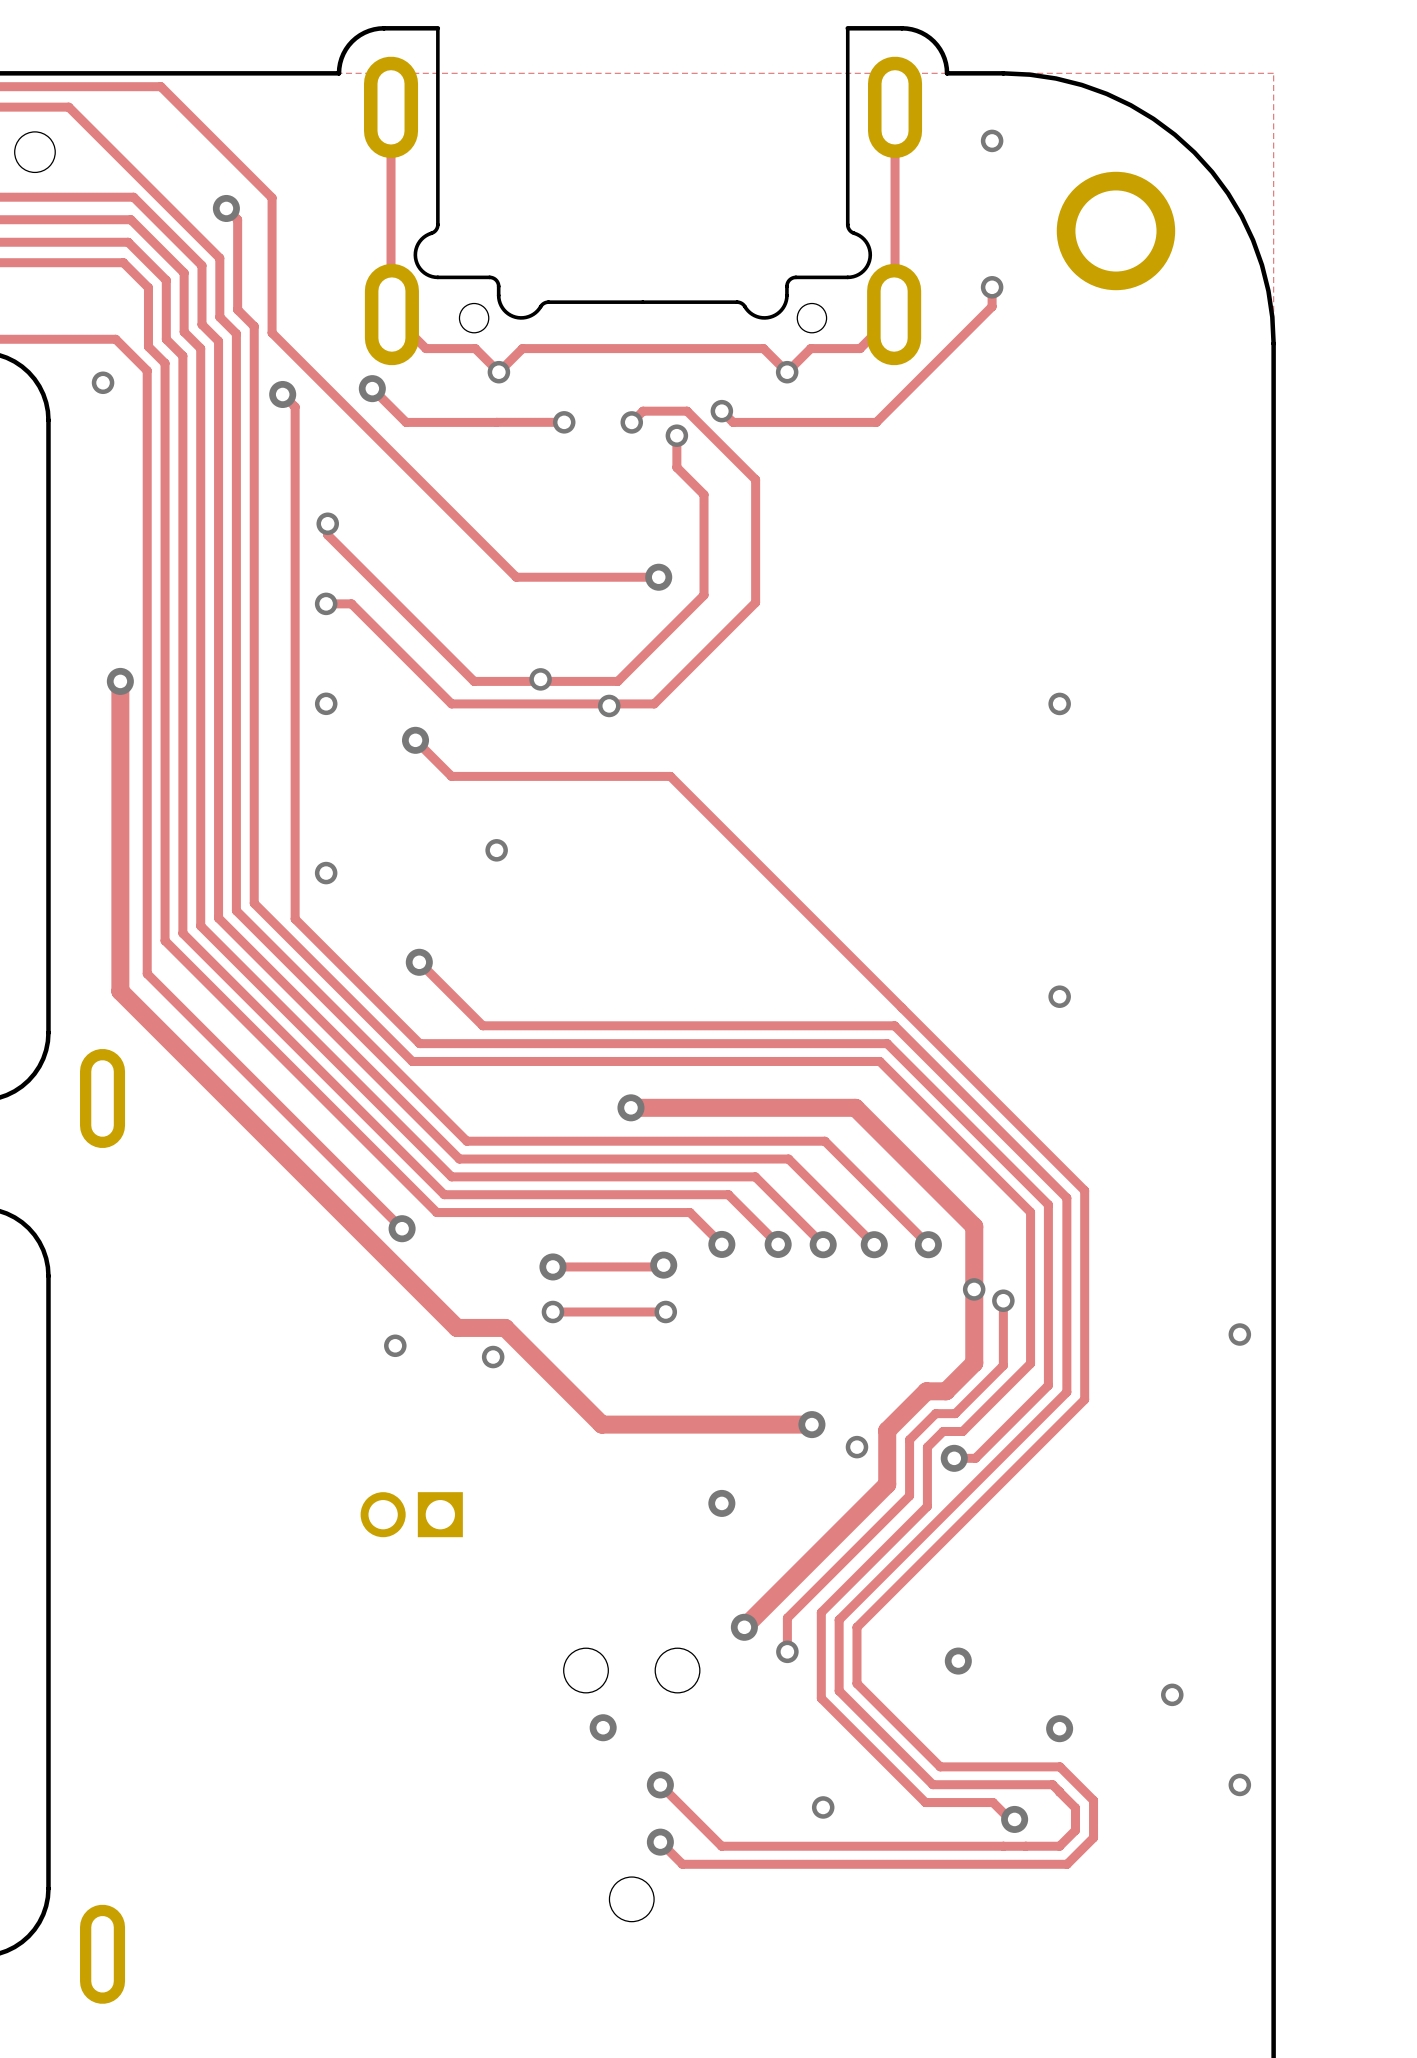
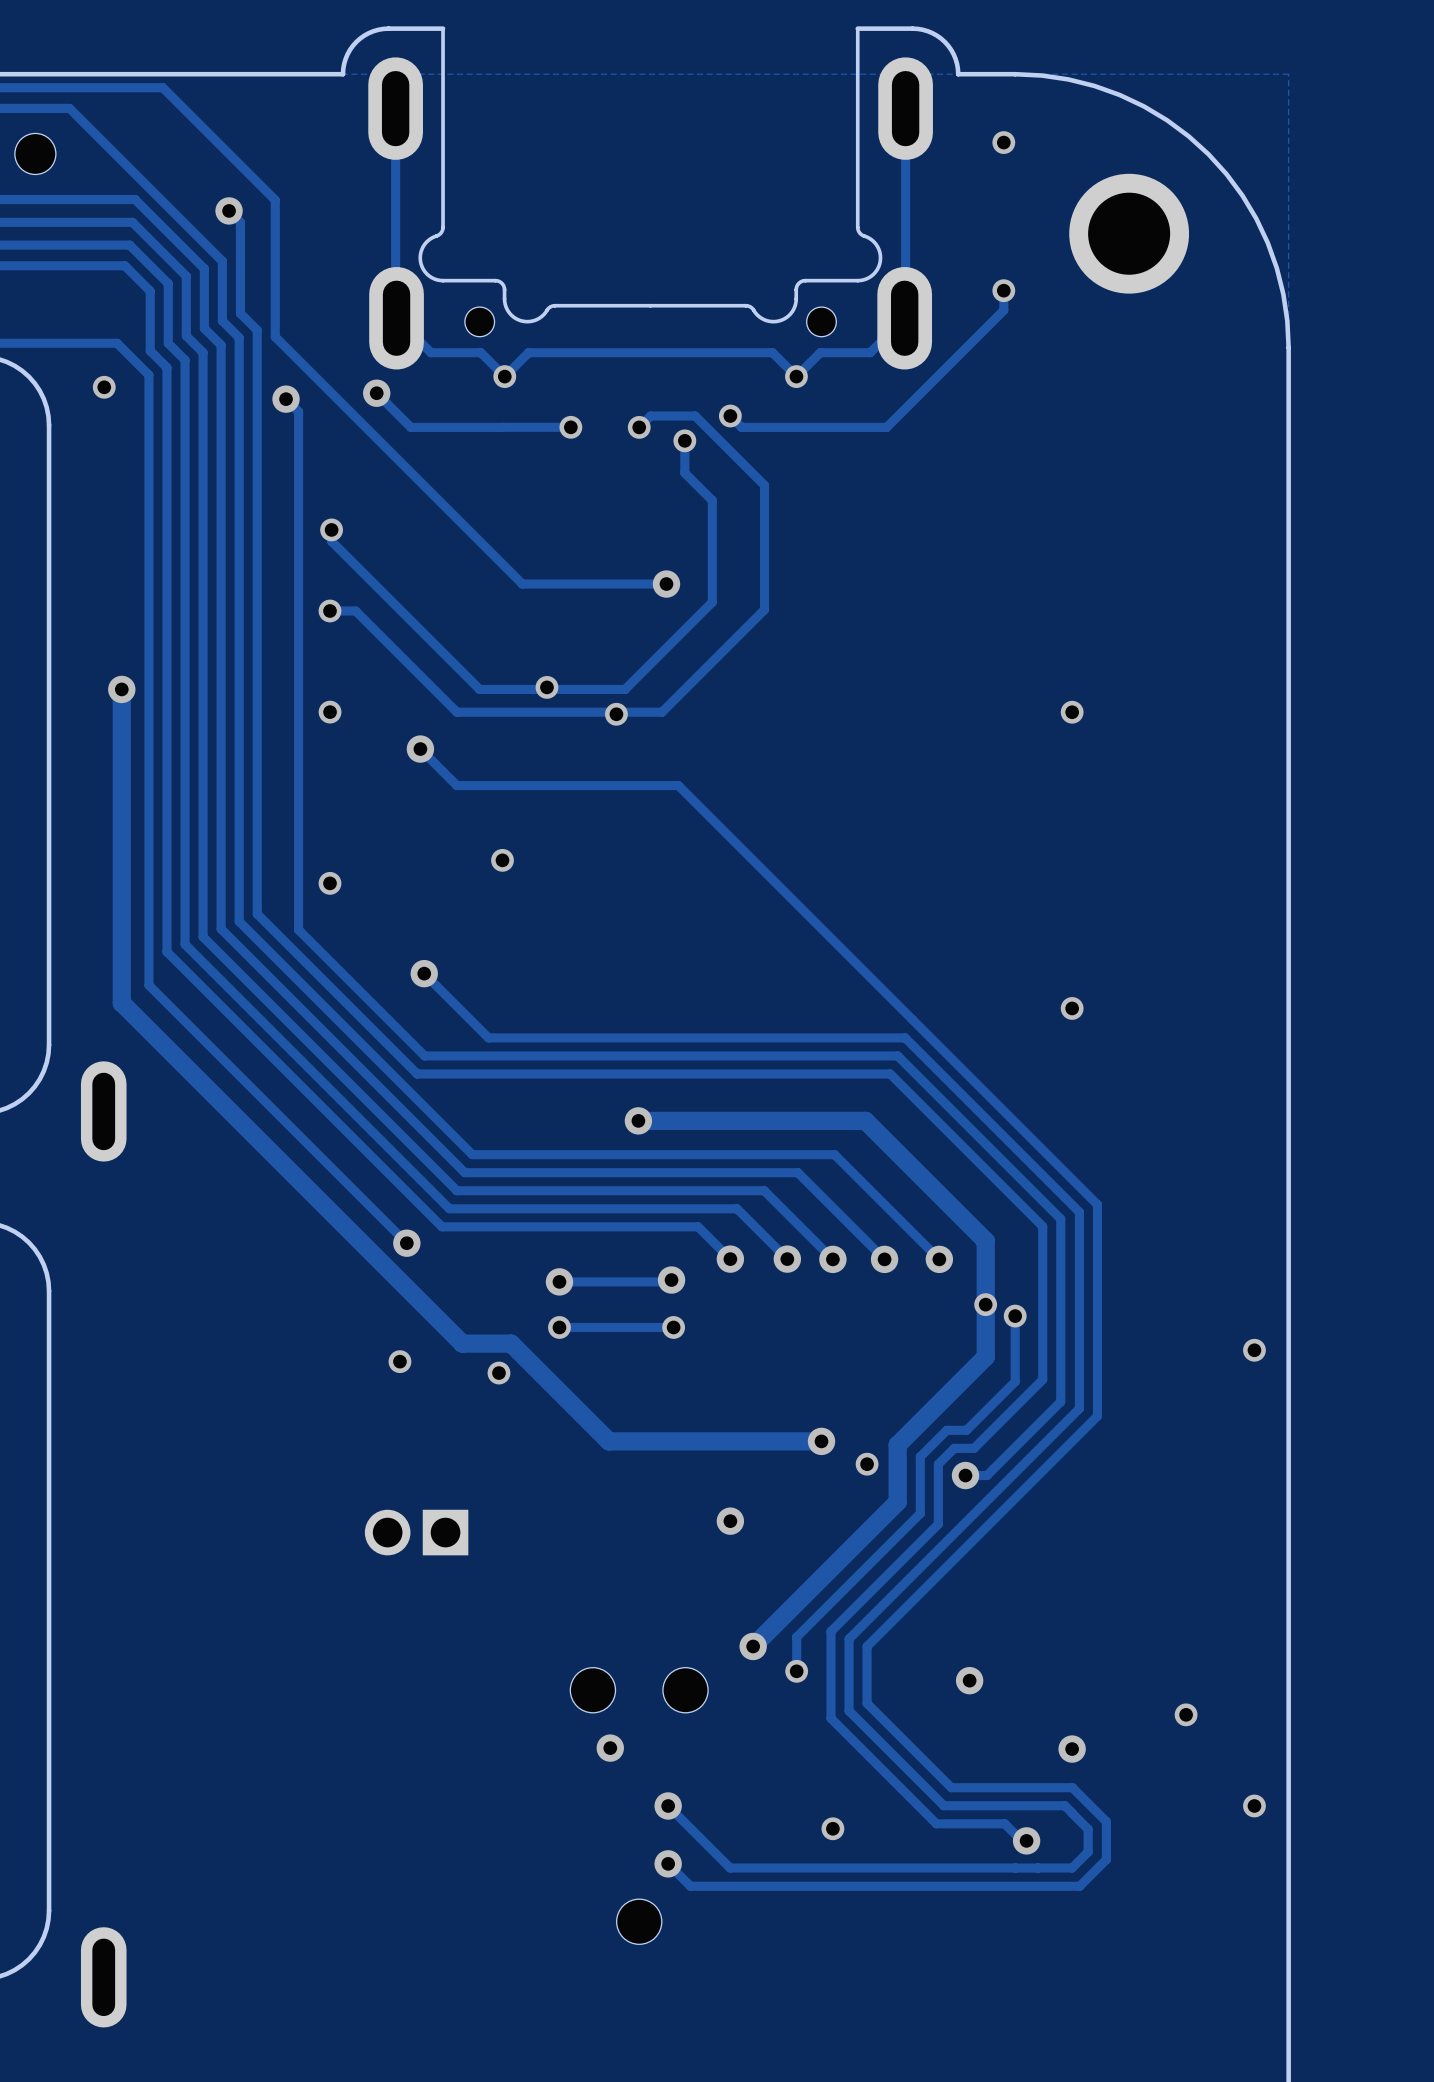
track: (974, 1341) (974, 1363) (946, 1391) (926, 1391) (887, 1430) -> (985, 1356) (897, 1444) (897, 1447)

